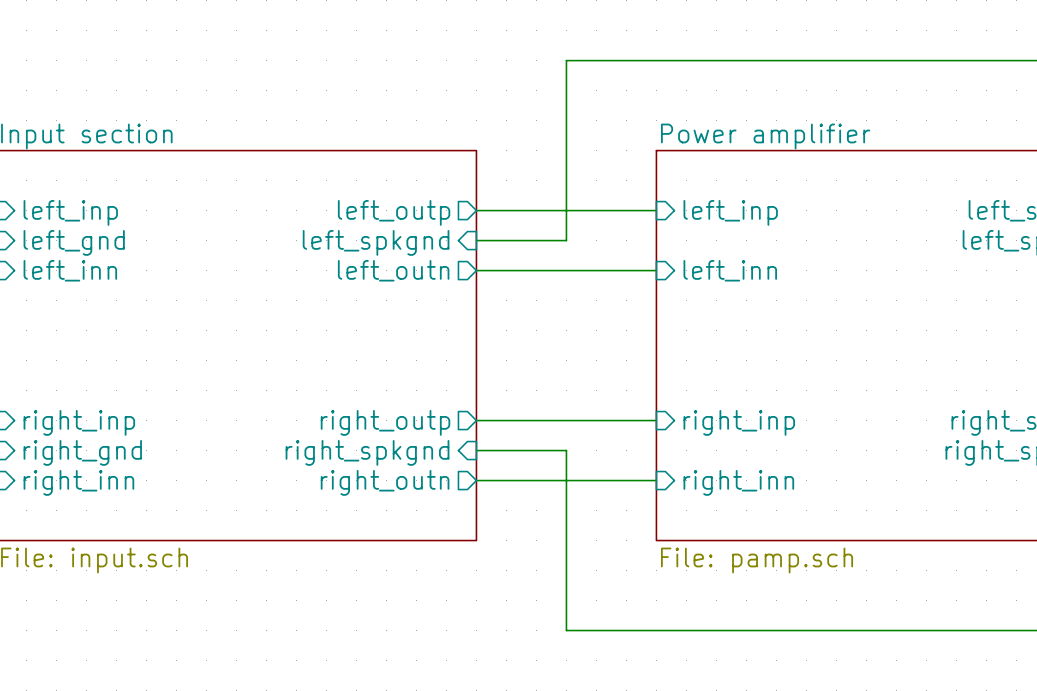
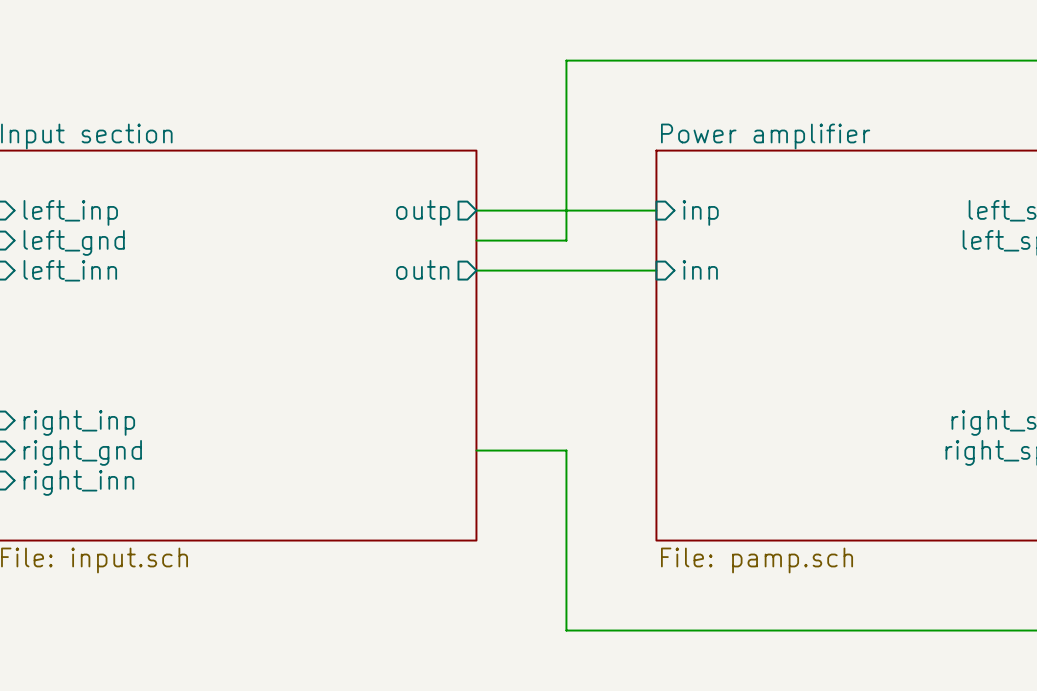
sheet pin: left_outp (394, 212) -> outp (423, 212)
sheet pin: left_inp (730, 212) -> inp (700, 212)
sheet pin: left_spkgnd (376, 242) -> none
sheet pin: left_outn (393, 270) -> outn (422, 269)
sheet pin: left_inn (730, 270) -> inn (700, 269)
wire: (476, 420) (656, 420) -> none
sheet pin: right_outp (385, 422) -> none
sheet pin: right_inp (739, 422) -> none
sheet pin: right_spkgnd (367, 452) -> none
wire: (476, 480) (656, 480) -> none
sheet pin: right_outn (385, 482) -> none
sheet pin: right_inn (738, 482) -> none

